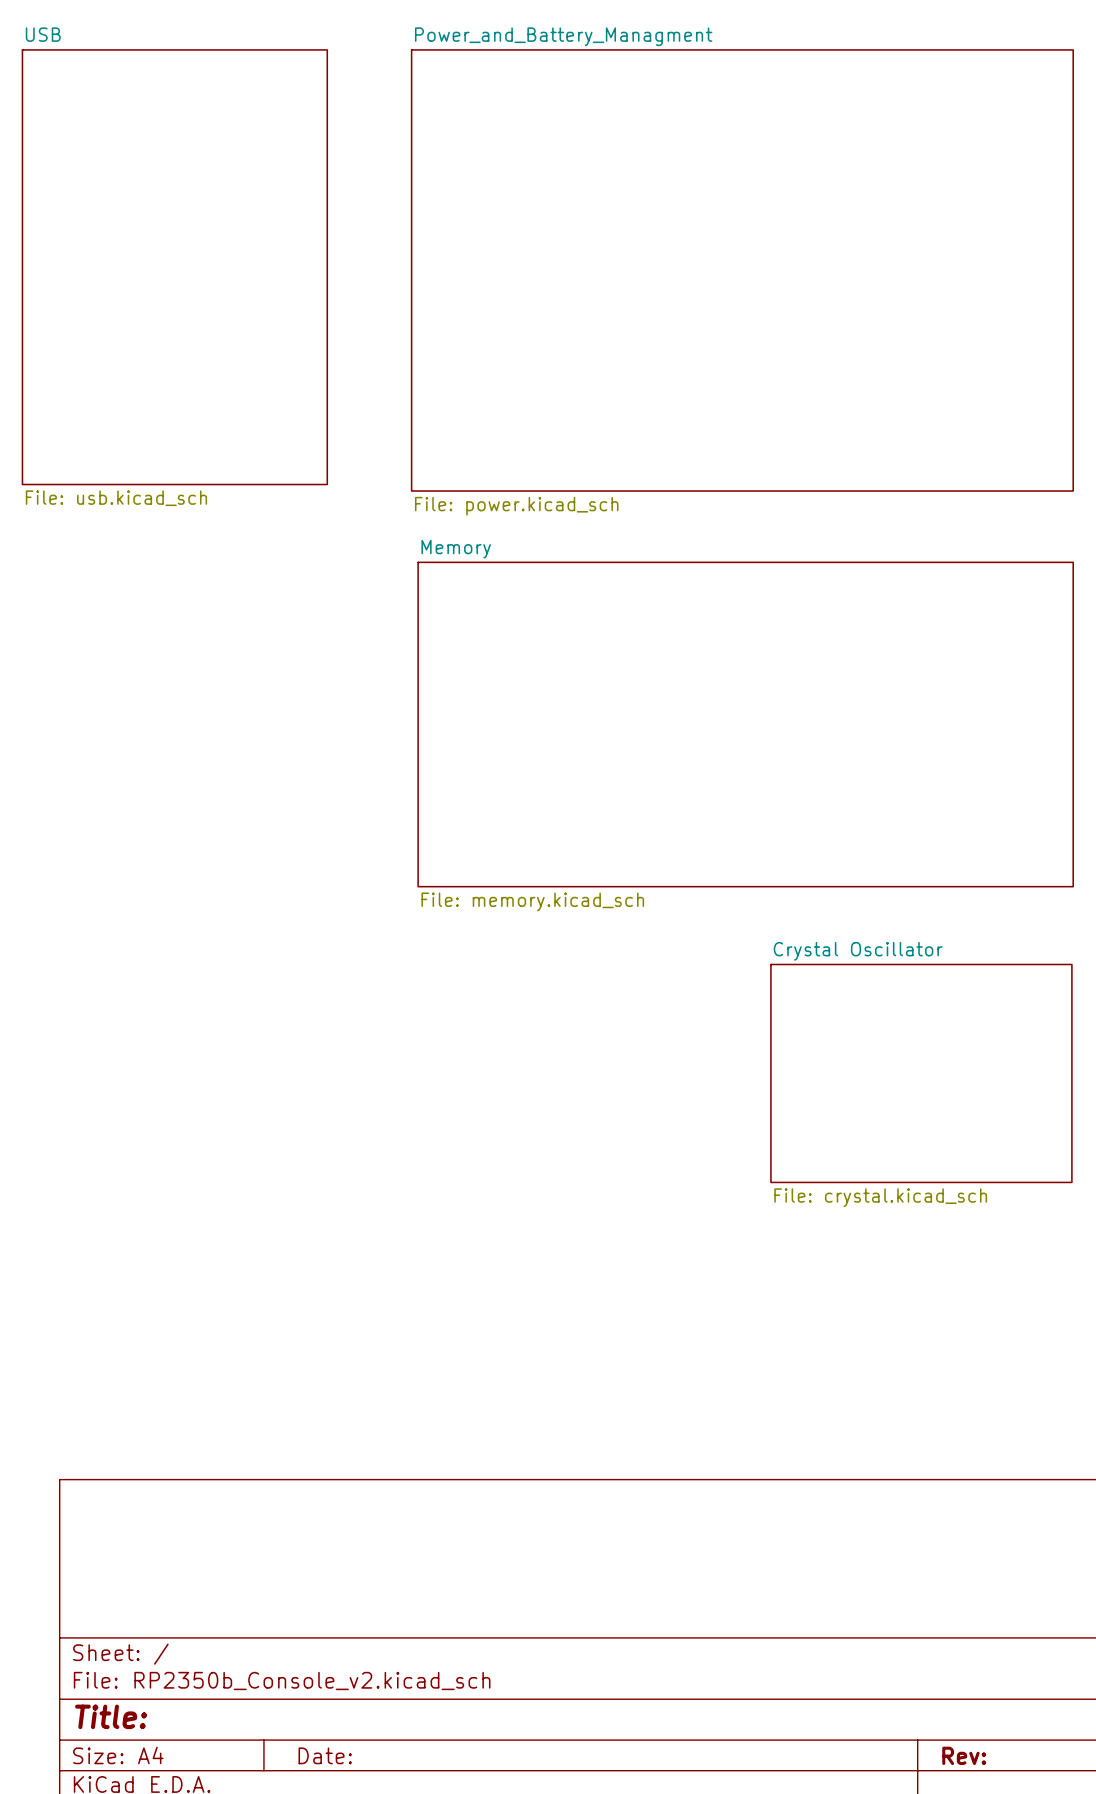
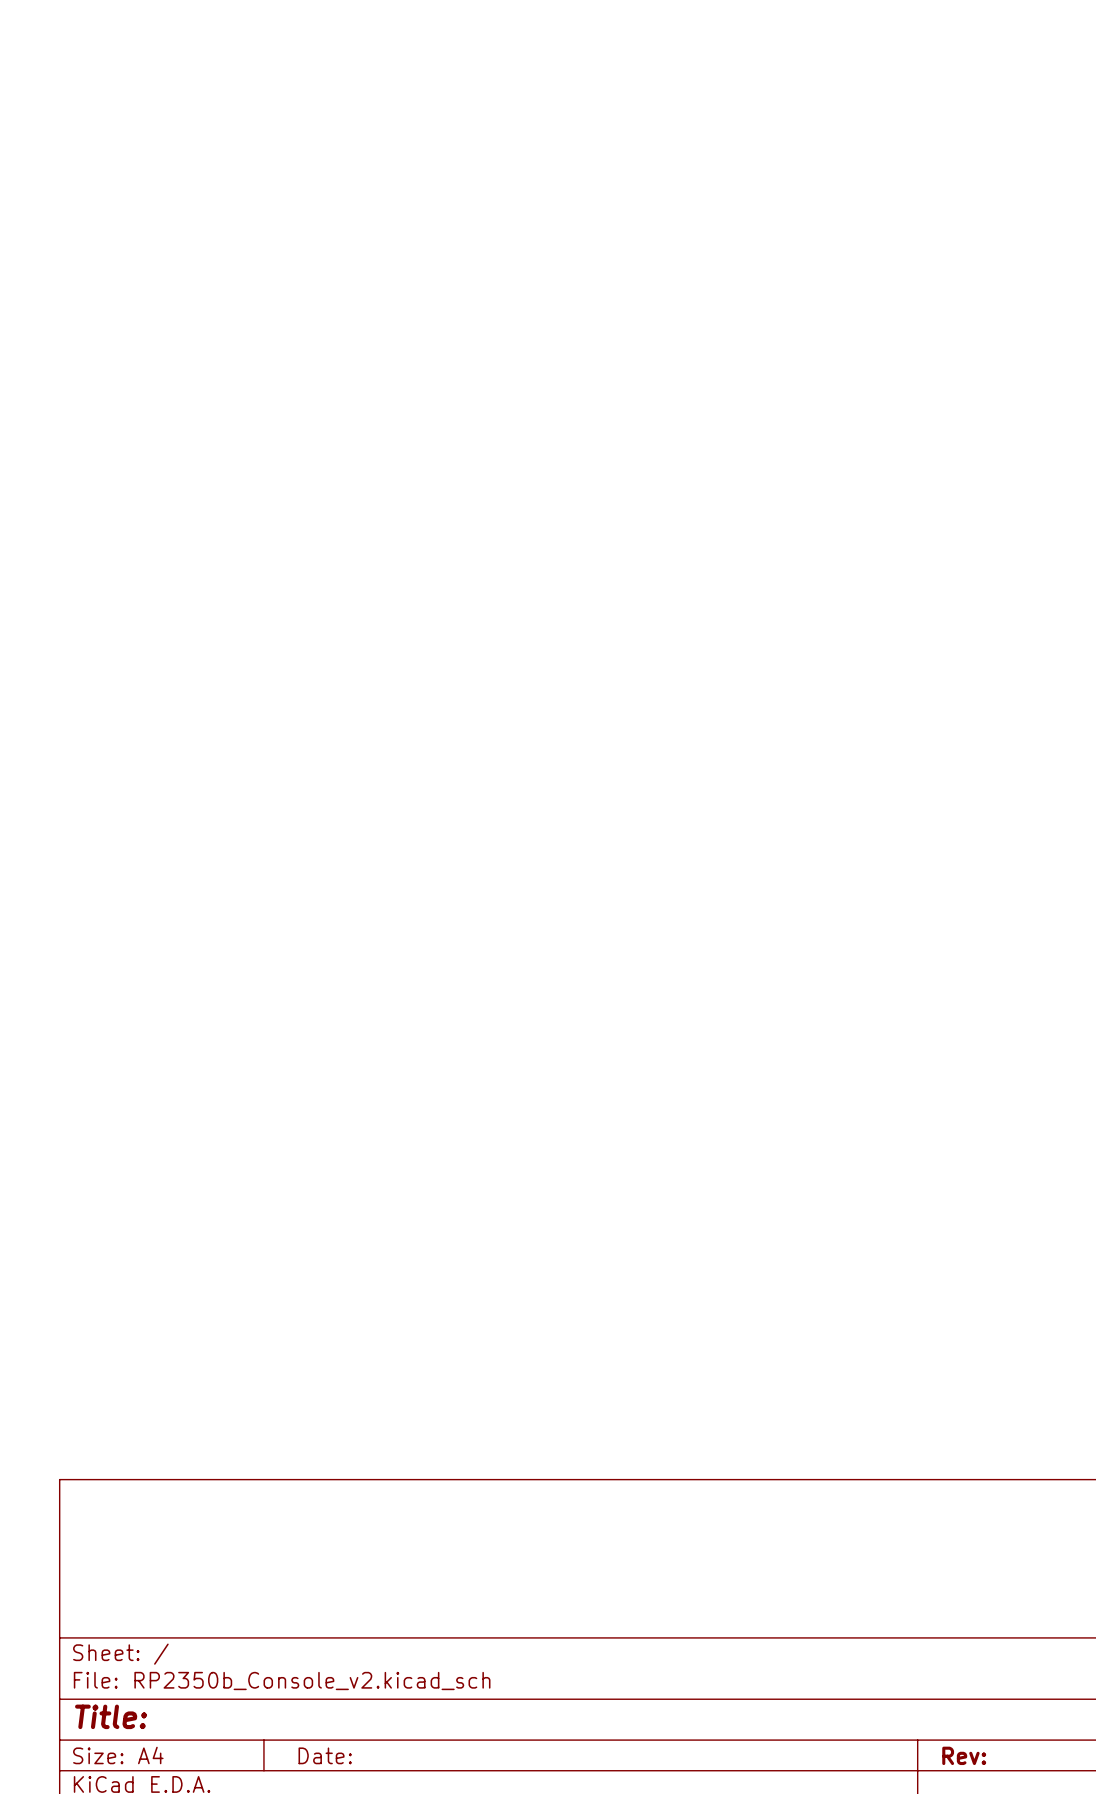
sheet USB: File: usb.kicad_sch (174, 267) -> none
sheet Power_and_Battery_Managment: File: power.kicad_sch (742, 270) -> none
sheet Memory: File: memory.kicad_sch (745, 724) -> none
sheet Crystal Oscillator: File: crystal.kicad_sch (921, 1073) -> none

